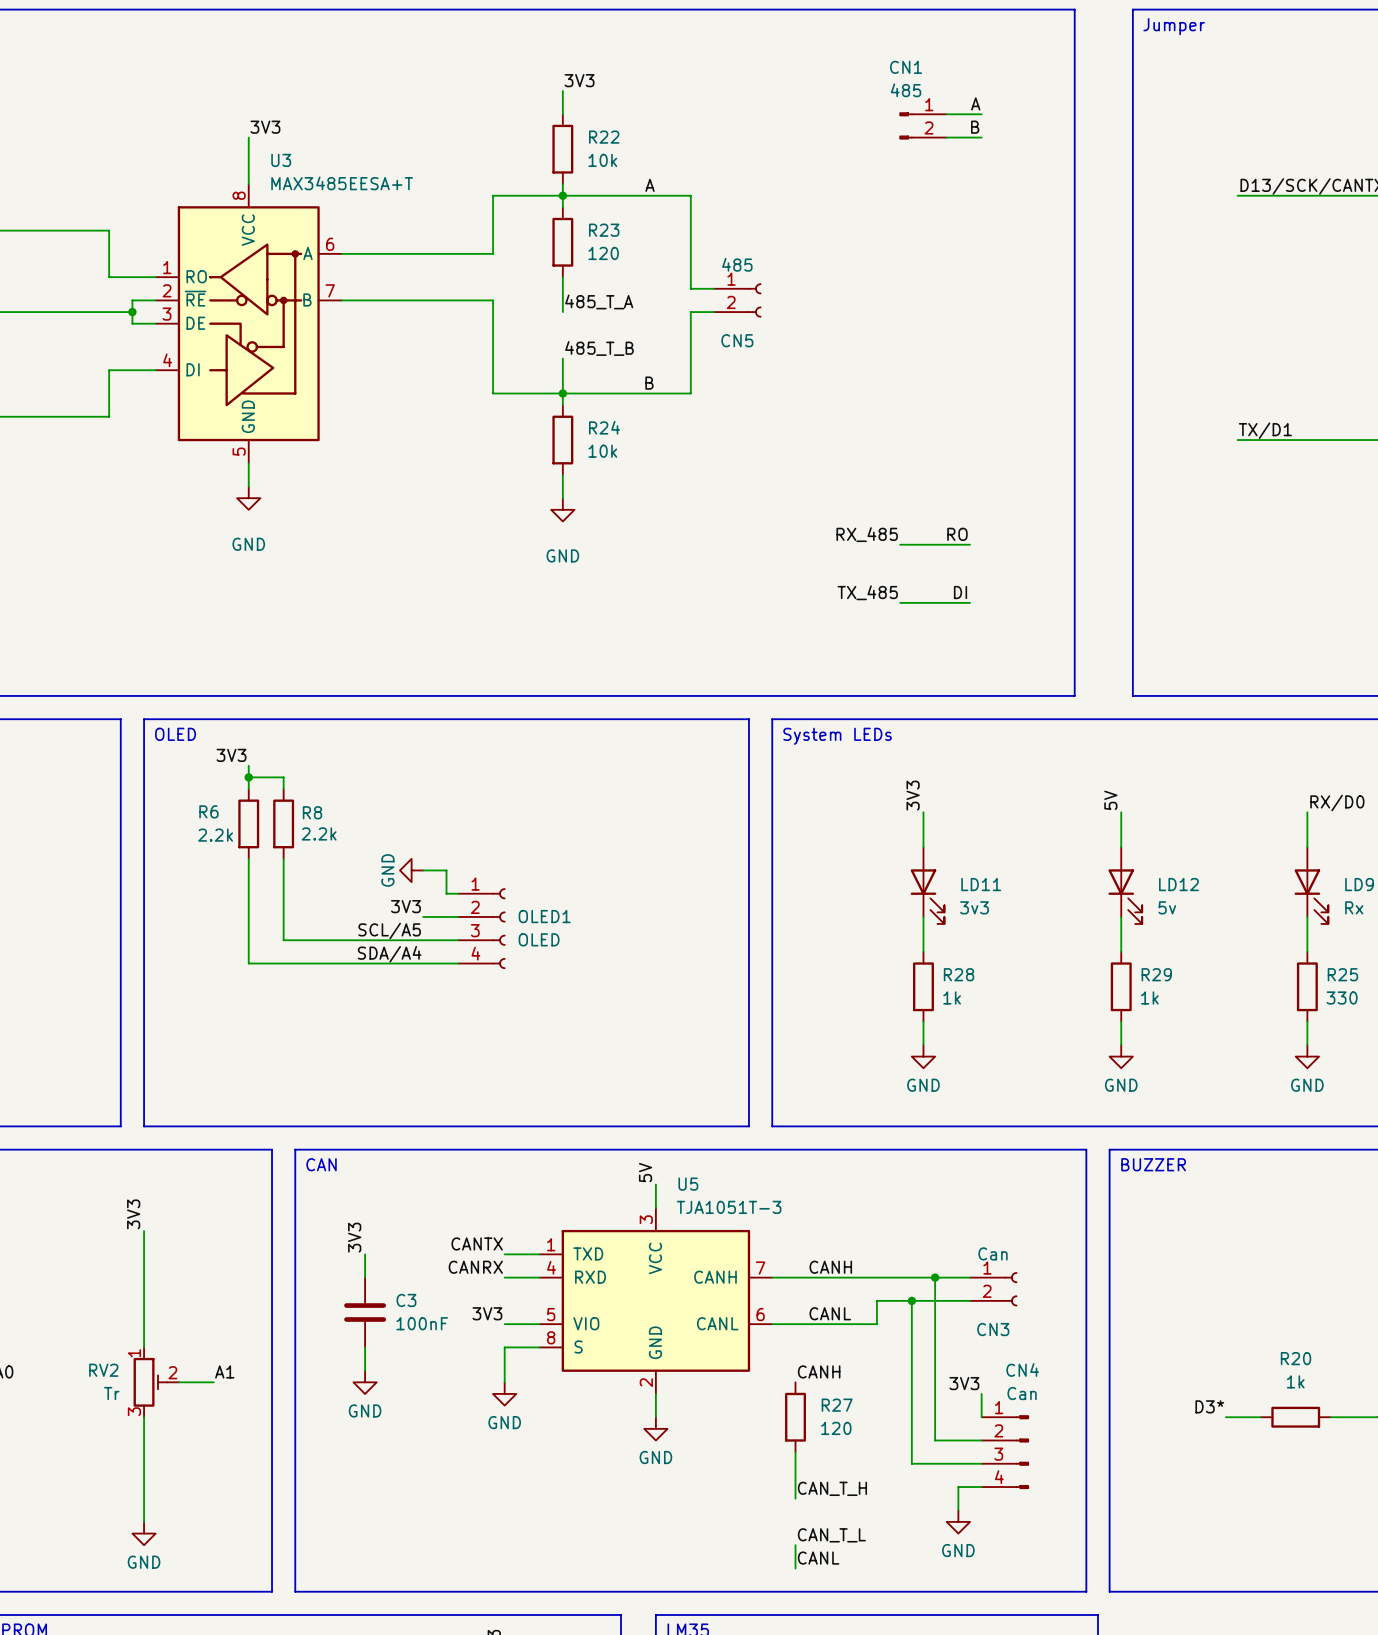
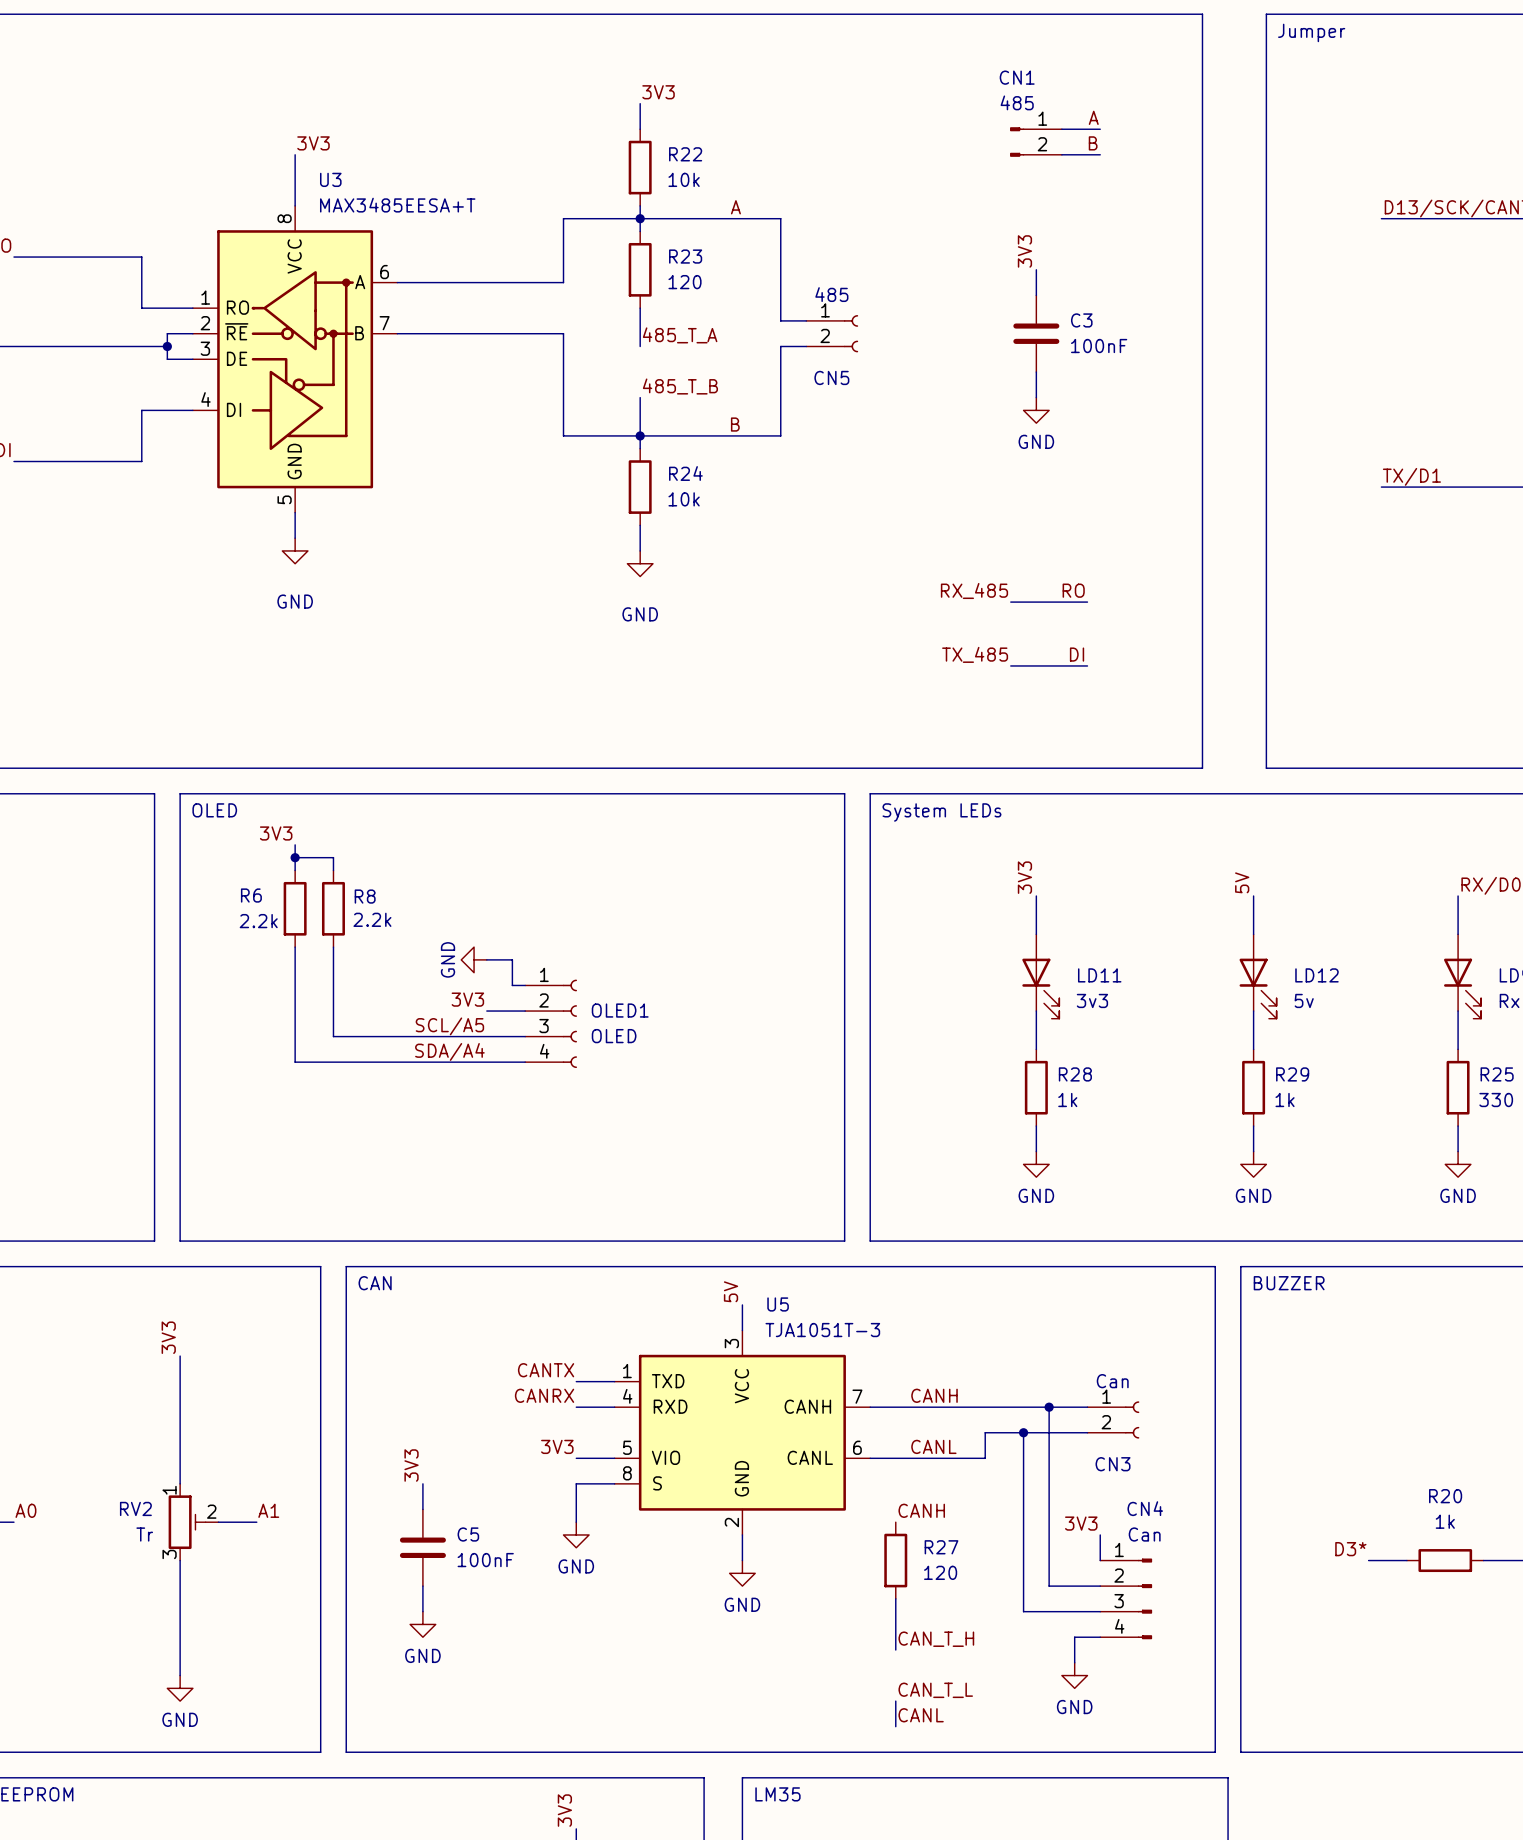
label: none -> 3V3 (1024, 251)
wire: none -> (1036, 269) (1036, 295)
wire: none -> (1036, 372) (1036, 397)
power symbol: none -> GND (1036, 410)
label position: 3V3 (354, 1237) -> 3V3 (411, 1465)
wire: (365, 1254) (365, 1277) -> (422, 1586) (422, 1611)
C3 position: (365, 1312) -> (1036, 333)
power symbol position: GND (365, 1382) -> GND (422, 1624)
C5: none -> 100nF (422, 1547)

